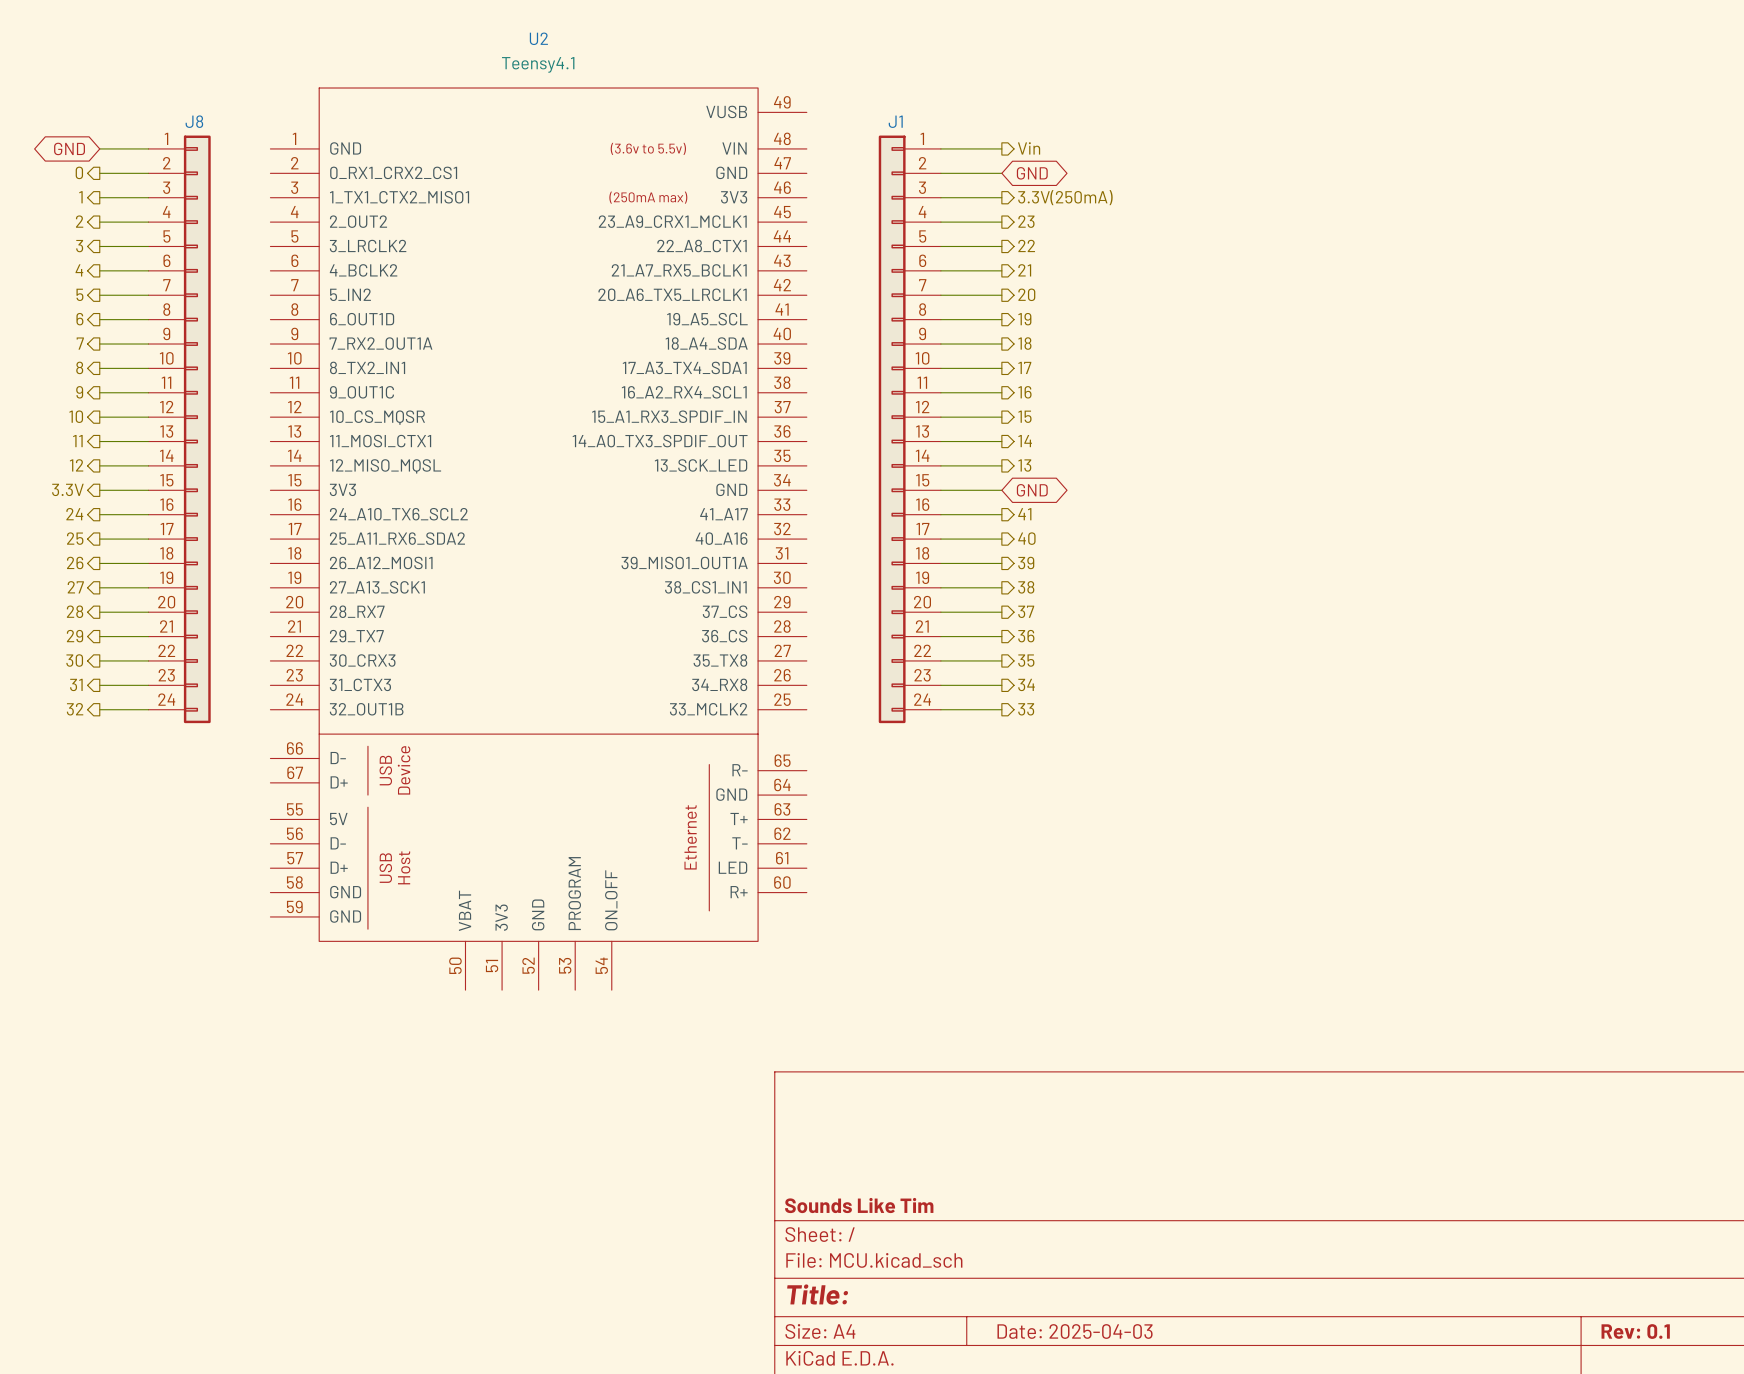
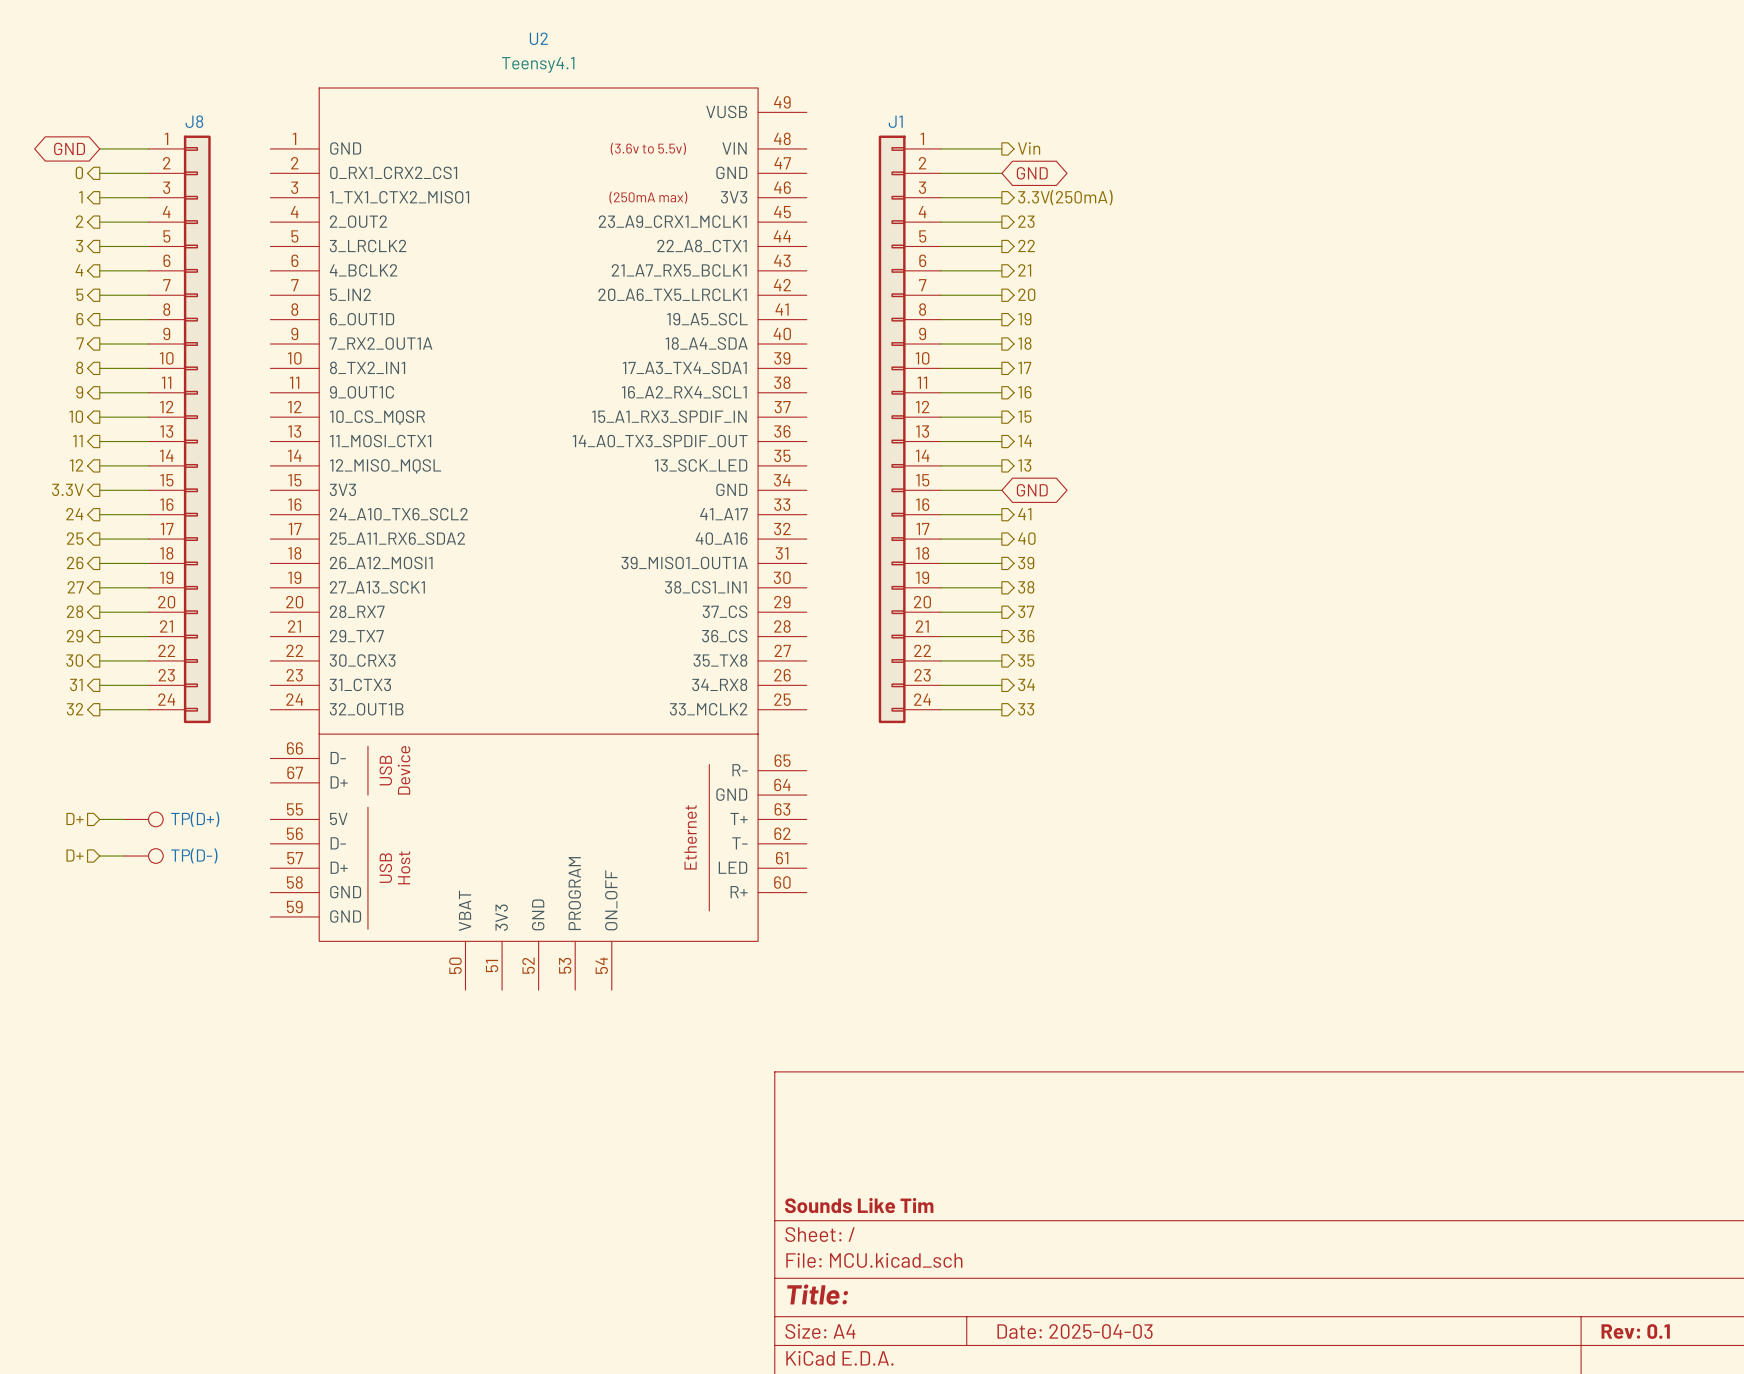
hierarchical label: none -> D+ (75, 818)
wire: none -> (99, 819) (124, 819)
TP(D+): none -> (143, 819)
hierarchical label: none -> D+ (75, 855)
wire: none -> (99, 856) (124, 856)
TP(D-): none -> (143, 856)

